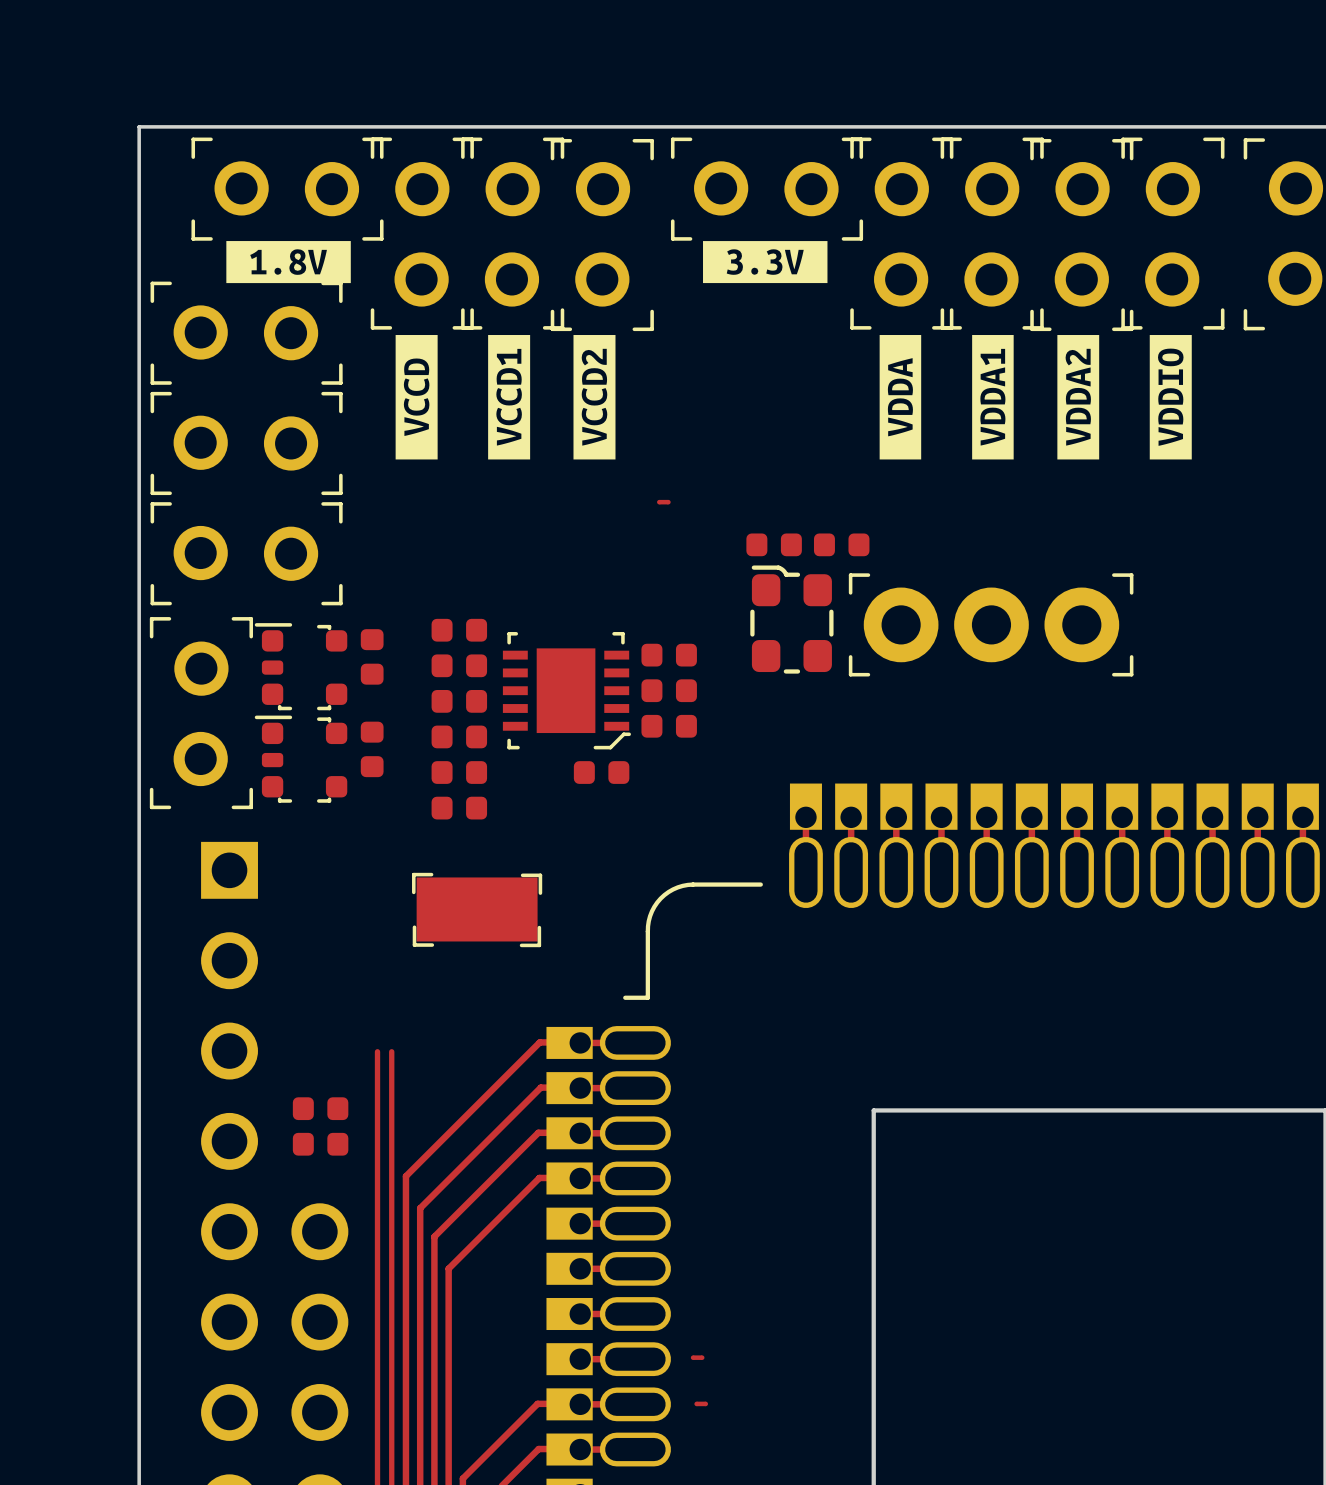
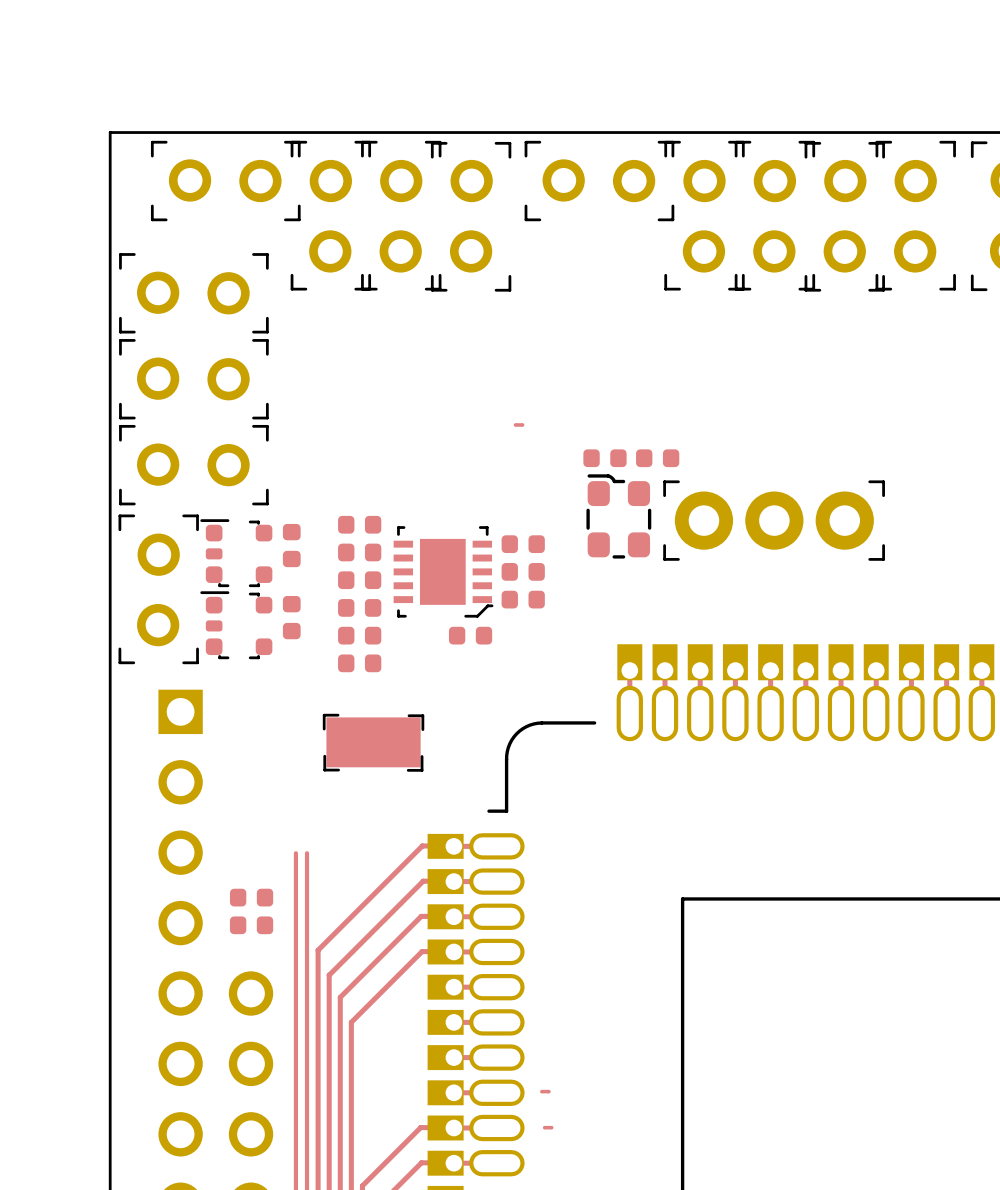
drawing: [226, 241, 351, 284] -> none
drawing: [703, 241, 828, 284] -> none
drawing: [395, 335, 438, 460] -> none
drawing: [488, 335, 531, 460] -> none
drawing: [573, 335, 616, 460] -> none
drawing: [879, 335, 922, 460] -> none
drawing: [972, 335, 1014, 460] -> none
drawing: [1057, 335, 1100, 460] -> none
drawing: [1149, 335, 1192, 460] -> none

